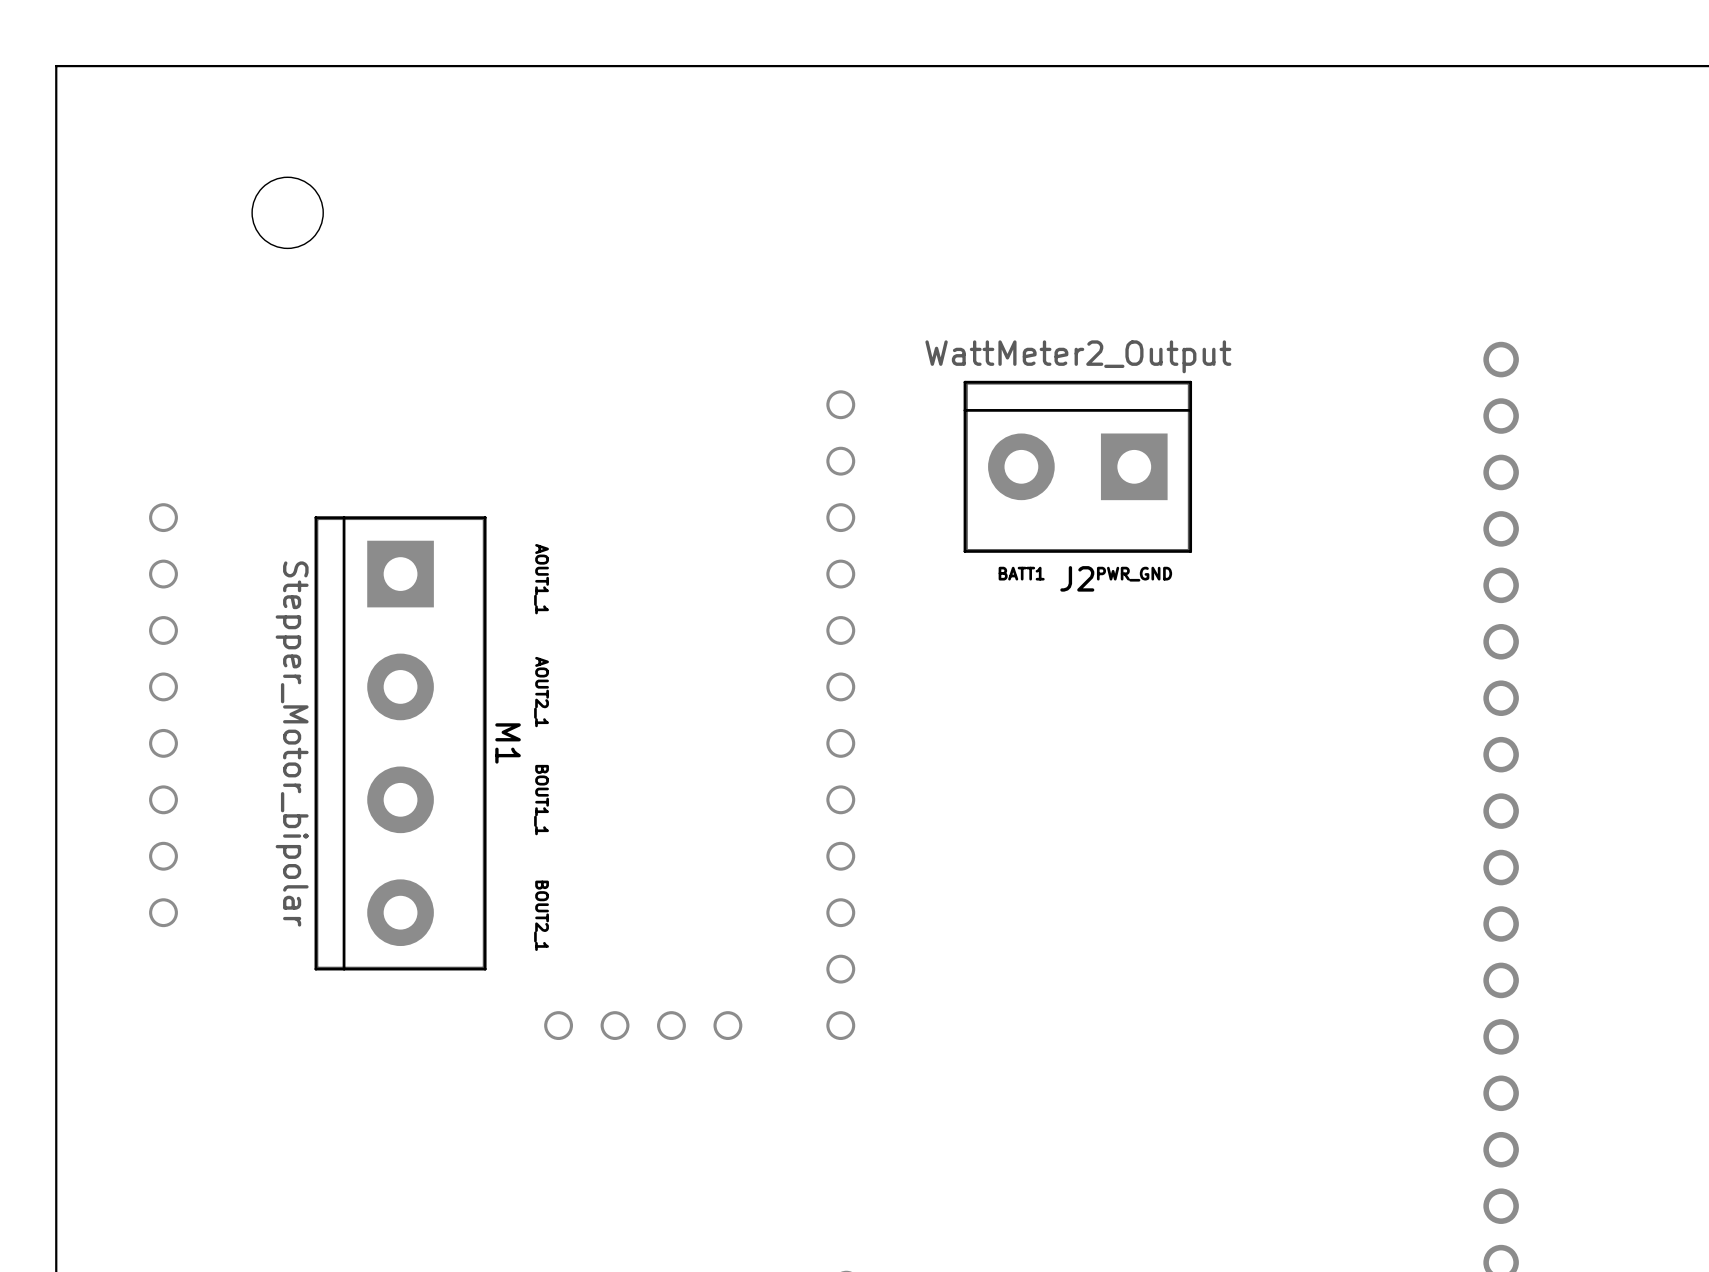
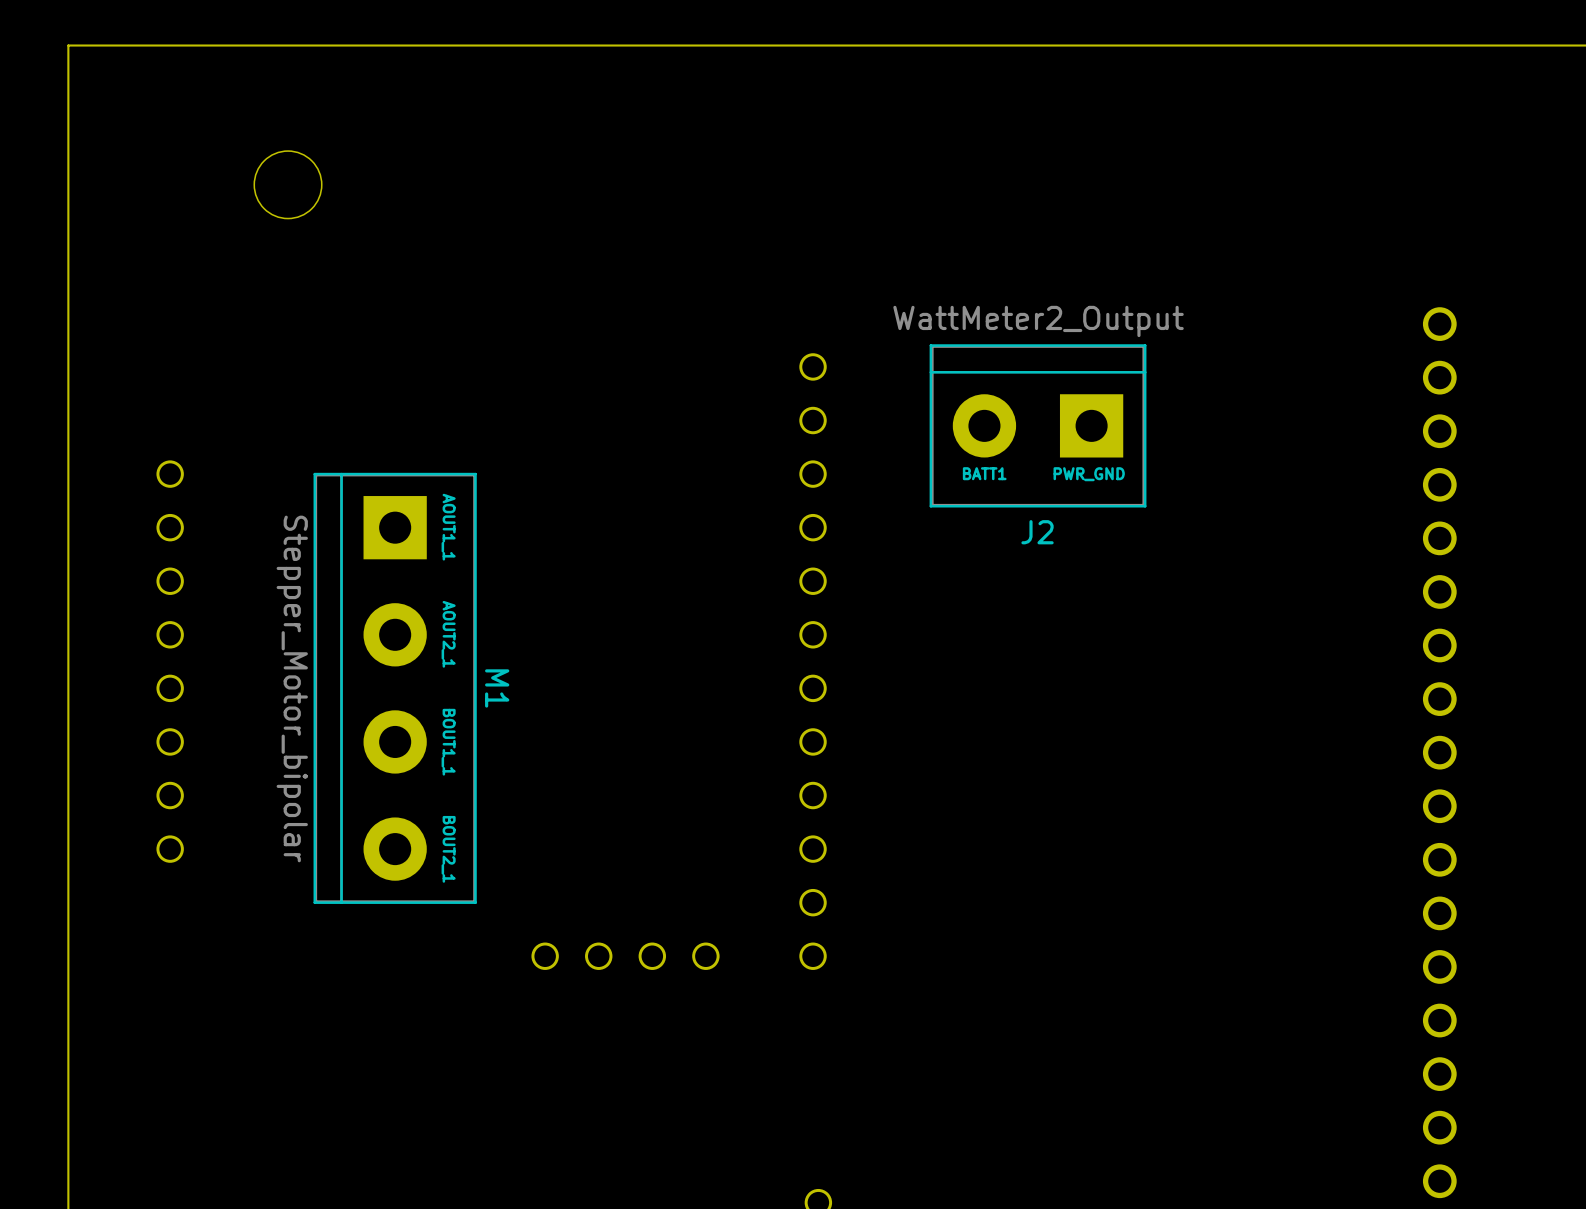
text position: BATT1 (1021, 573) -> BATT1 (984, 473)
text position: PWR_GND (1134, 574) -> PWR_GND (1089, 474)
text position: AOUT1_1 (541, 579) -> AOUT1_1 (448, 527)
text position: AOUT2_1 (541, 692) -> AOUT2_1 (448, 634)
text position: BOUT1_1 (541, 800) -> BOUT1_1 (448, 742)
text position: BOUT2_1 (541, 915) -> BOUT2_1 (448, 849)

